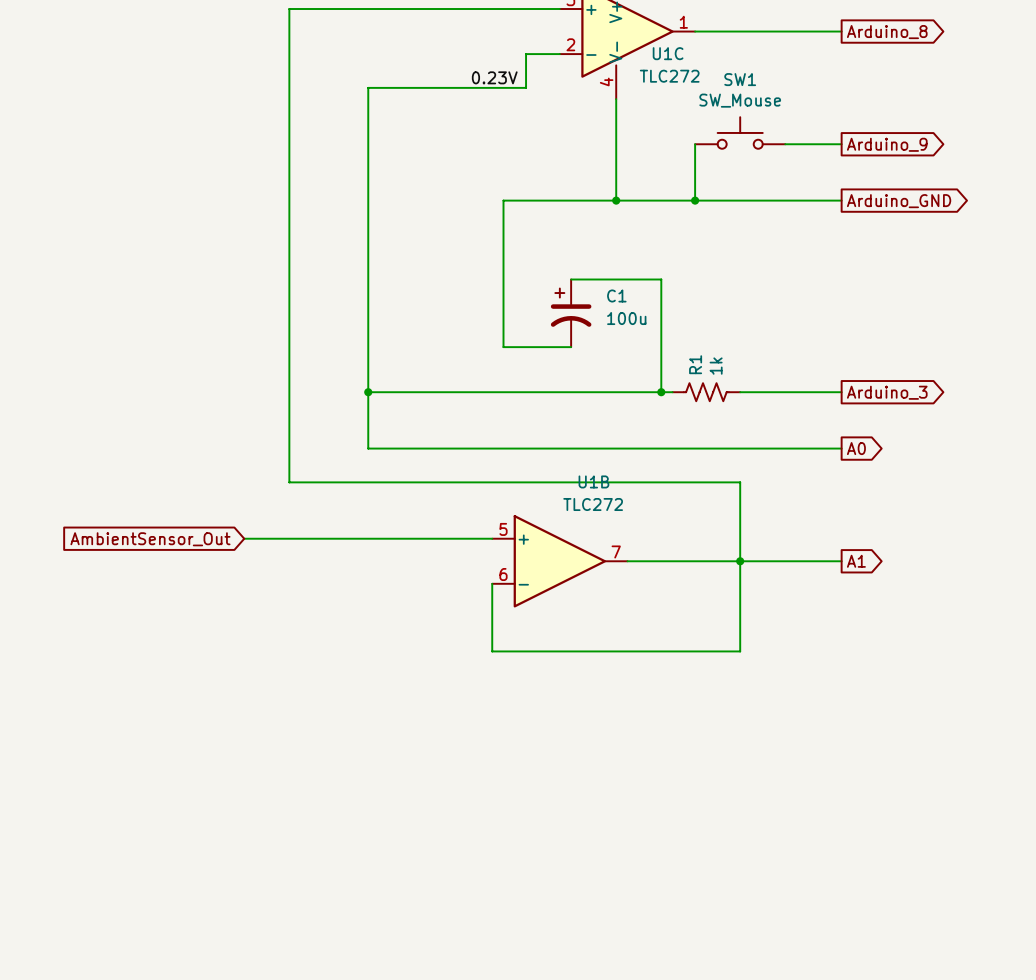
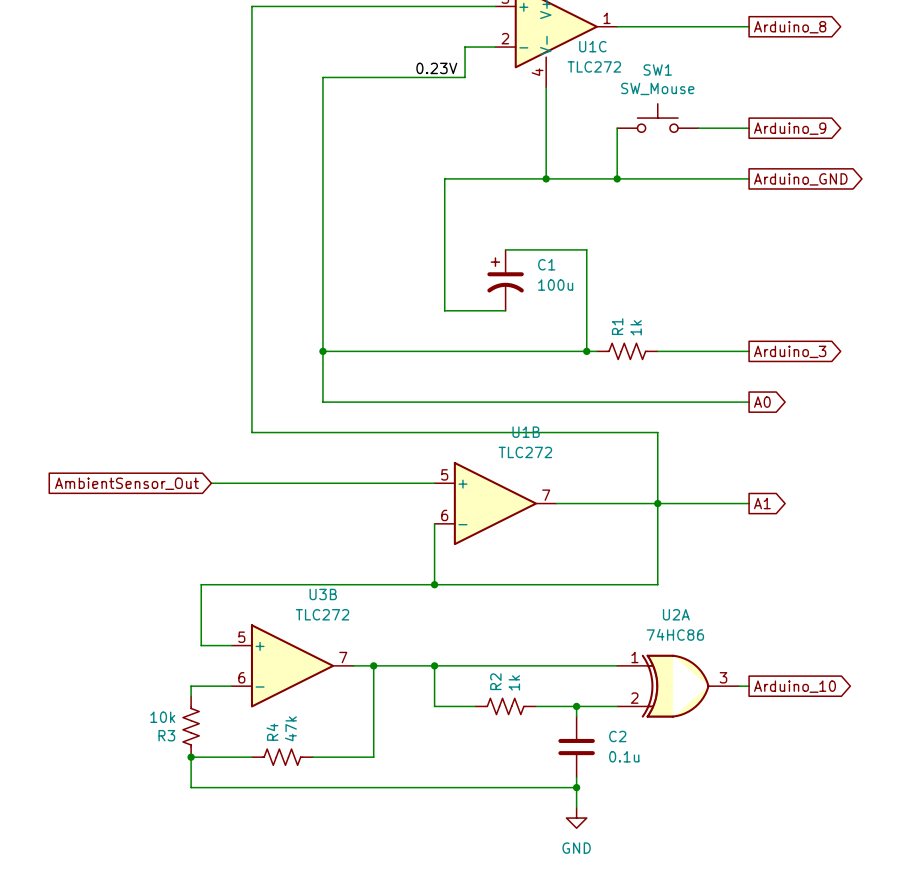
wire: none -> (434, 584) (201, 584) (201, 645) (231, 645)
junction: none -> (434, 584)
U3B: none -> TLC272 (292, 665)
wire: none -> (353, 665) (617, 665)
wire: none -> (373, 665) (373, 757) (312, 757)
junction: none -> (373, 665)
wire: none -> (434, 665) (434, 706) (475, 706)
junction: none -> (434, 665)
wire: none -> (231, 686) (191, 686) (191, 696)
U2A: none -> 74HC86 (678, 686)
wire: none -> (738, 686) (749, 686)
global label: none -> Arduino_10 (794, 686)
R2: none -> 1k (505, 706)
wire: none -> (536, 706) (617, 706)
wire: none -> (576, 706) (576, 716)
junction: none -> (576, 706)
R3: none -> 10k (191, 726)
C2: none -> 0.1u (576, 747)
junction: none -> (191, 757)
wire: none -> (251, 757) (191, 757) (191, 787) (576, 787)
R4: none -> 47k (282, 757)
wire: none -> (576, 777) (576, 807)
junction: none -> (576, 787)
power symbol: none -> GND (576, 818)

